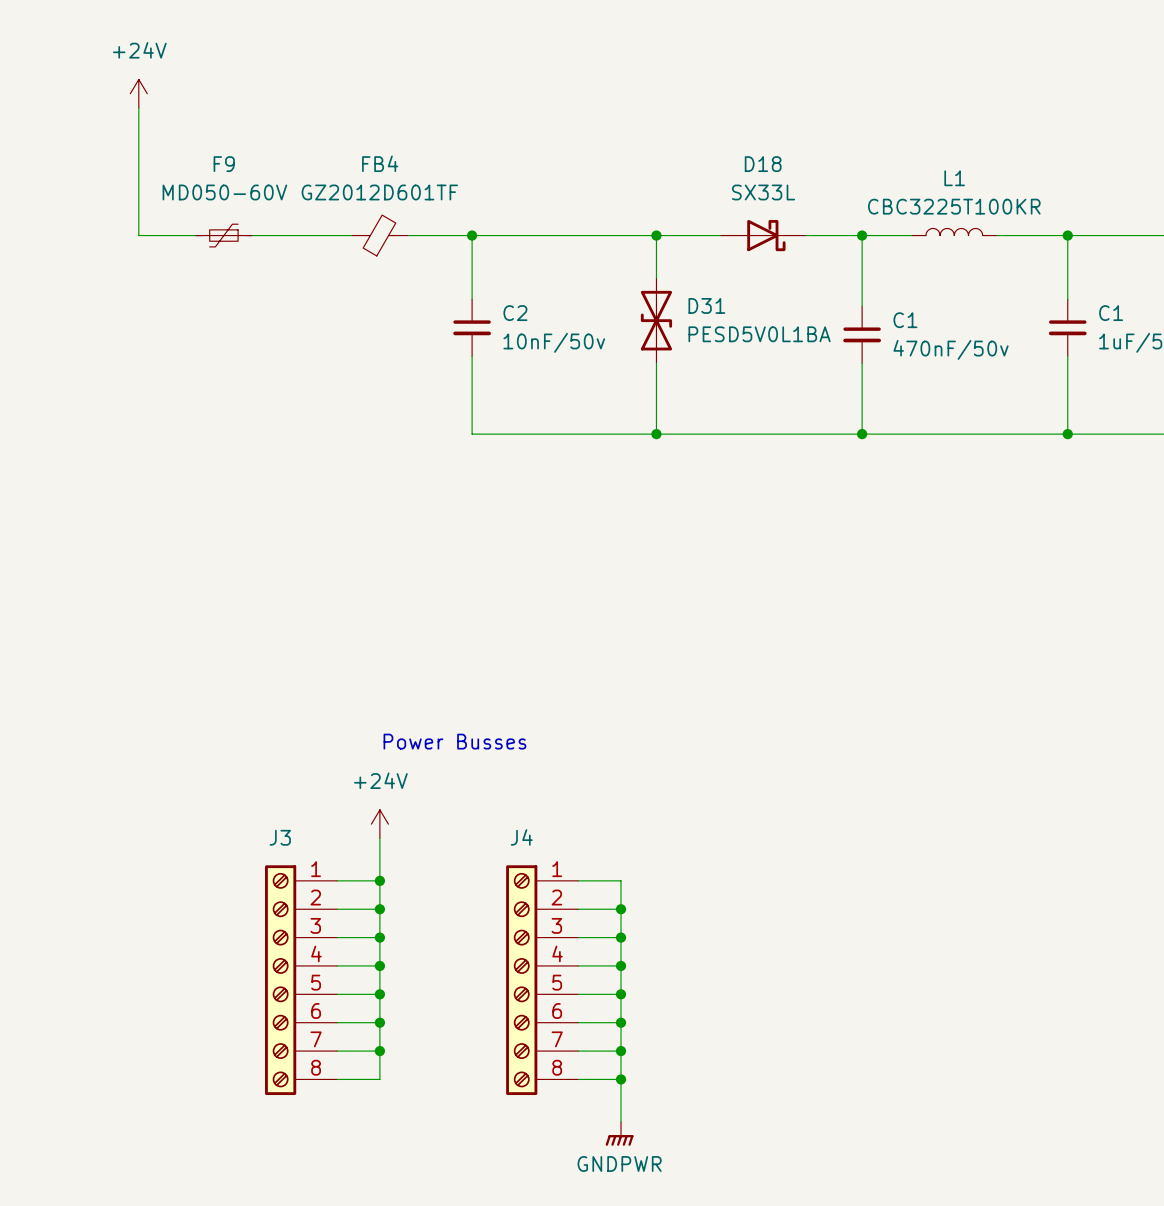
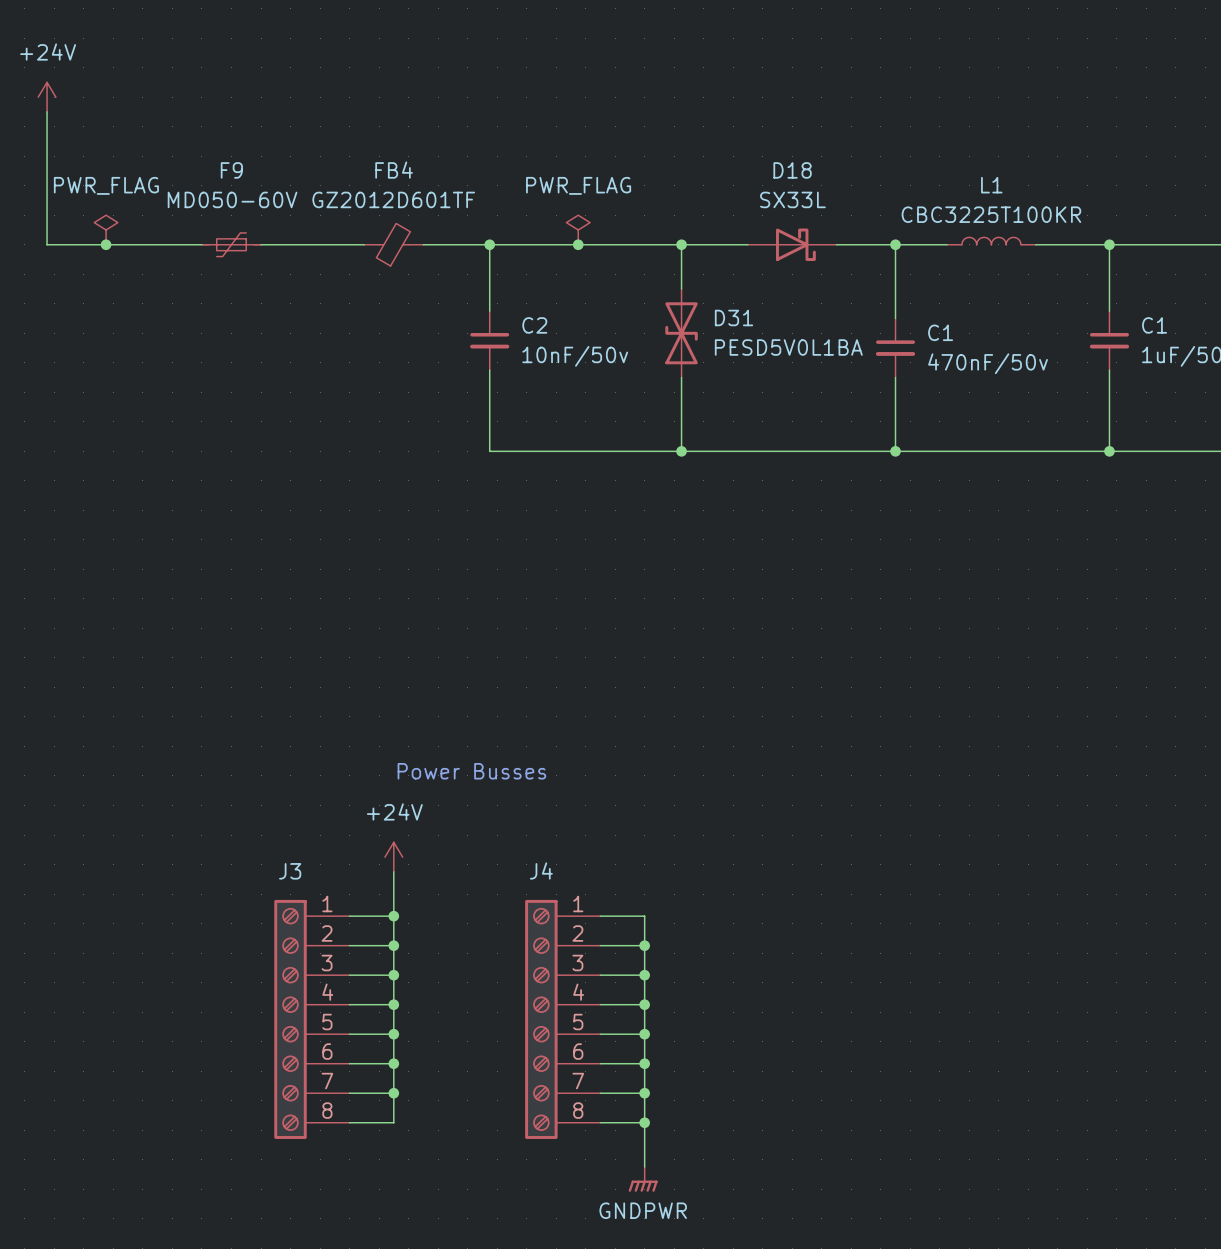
power symbol position: +24V (138, 93) -> +24V (47, 97)
wire: (138, 107) (138, 235) -> (47, 111) (47, 244) (142, 244)
power symbol: none -> PWR_FLAG (106, 230)
power symbol: none -> PWR_FLAG (578, 230)
junction: none -> (106, 244)
junction: none -> (578, 244)

